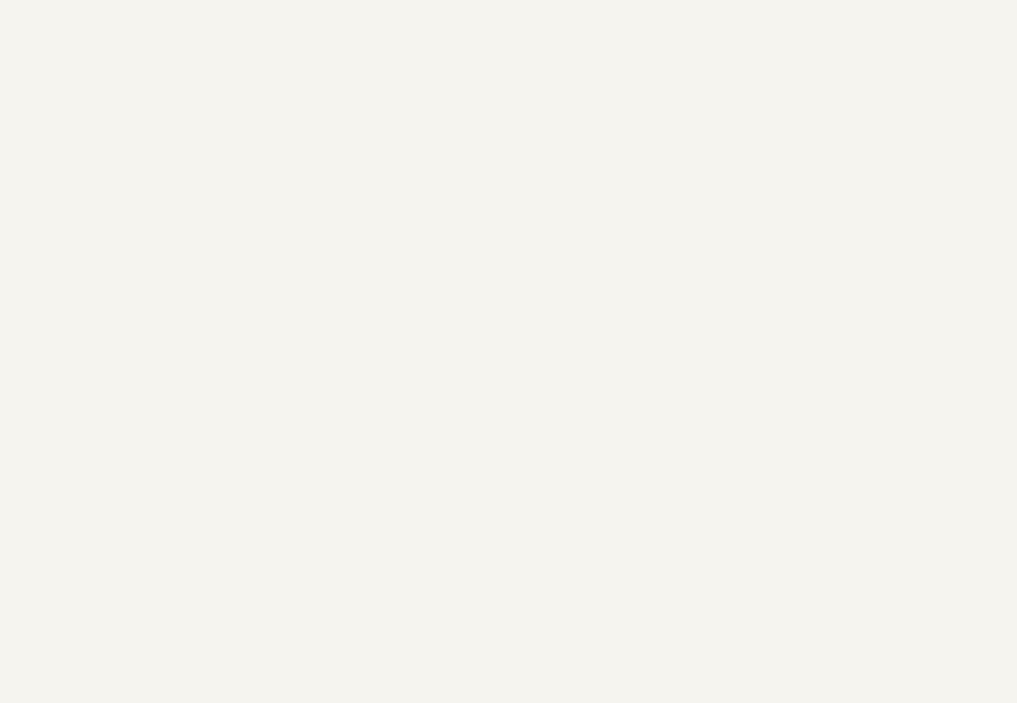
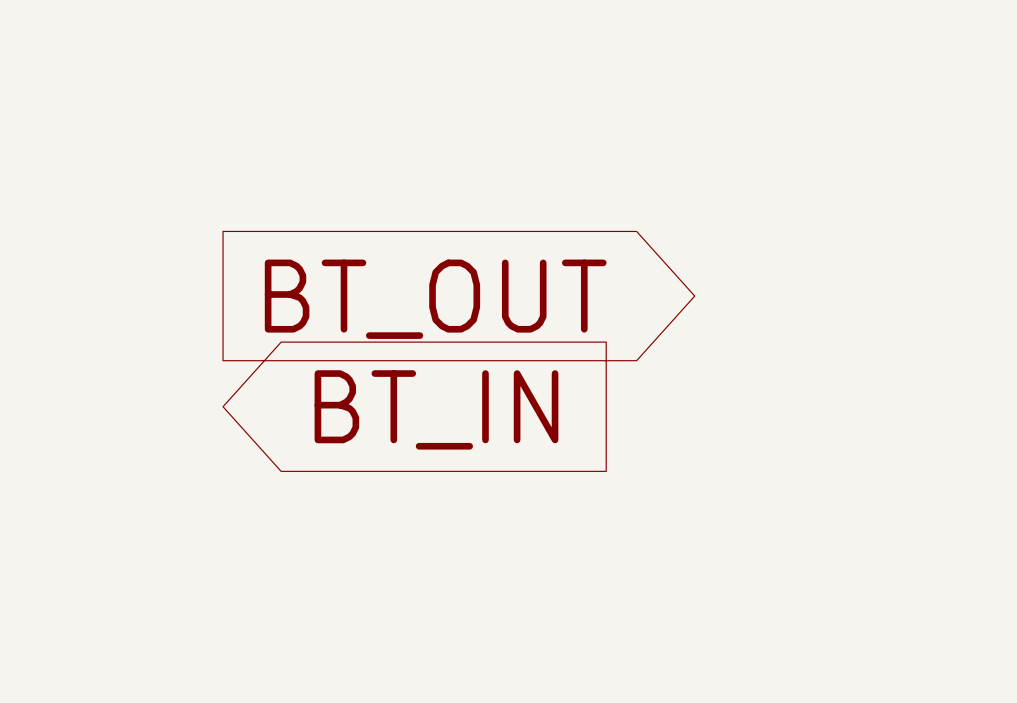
global label: none -> BT_OUT (435, 299)
global label: none -> BT_IN (436, 409)

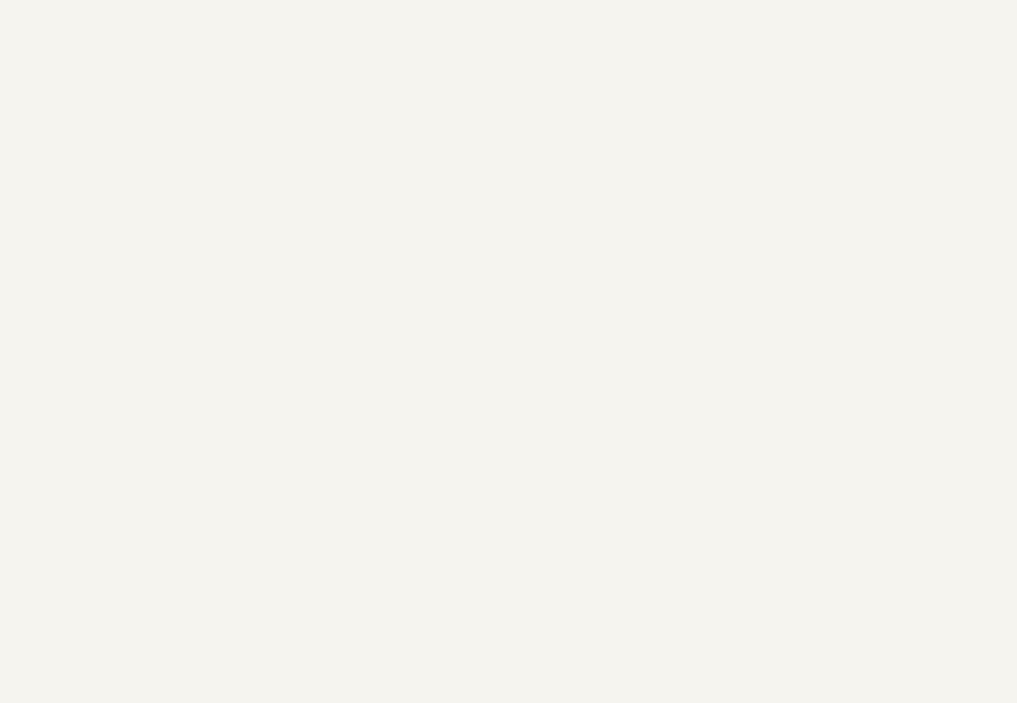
global label: BT_OUT (435, 299) -> none
global label: BT_IN (436, 409) -> none

